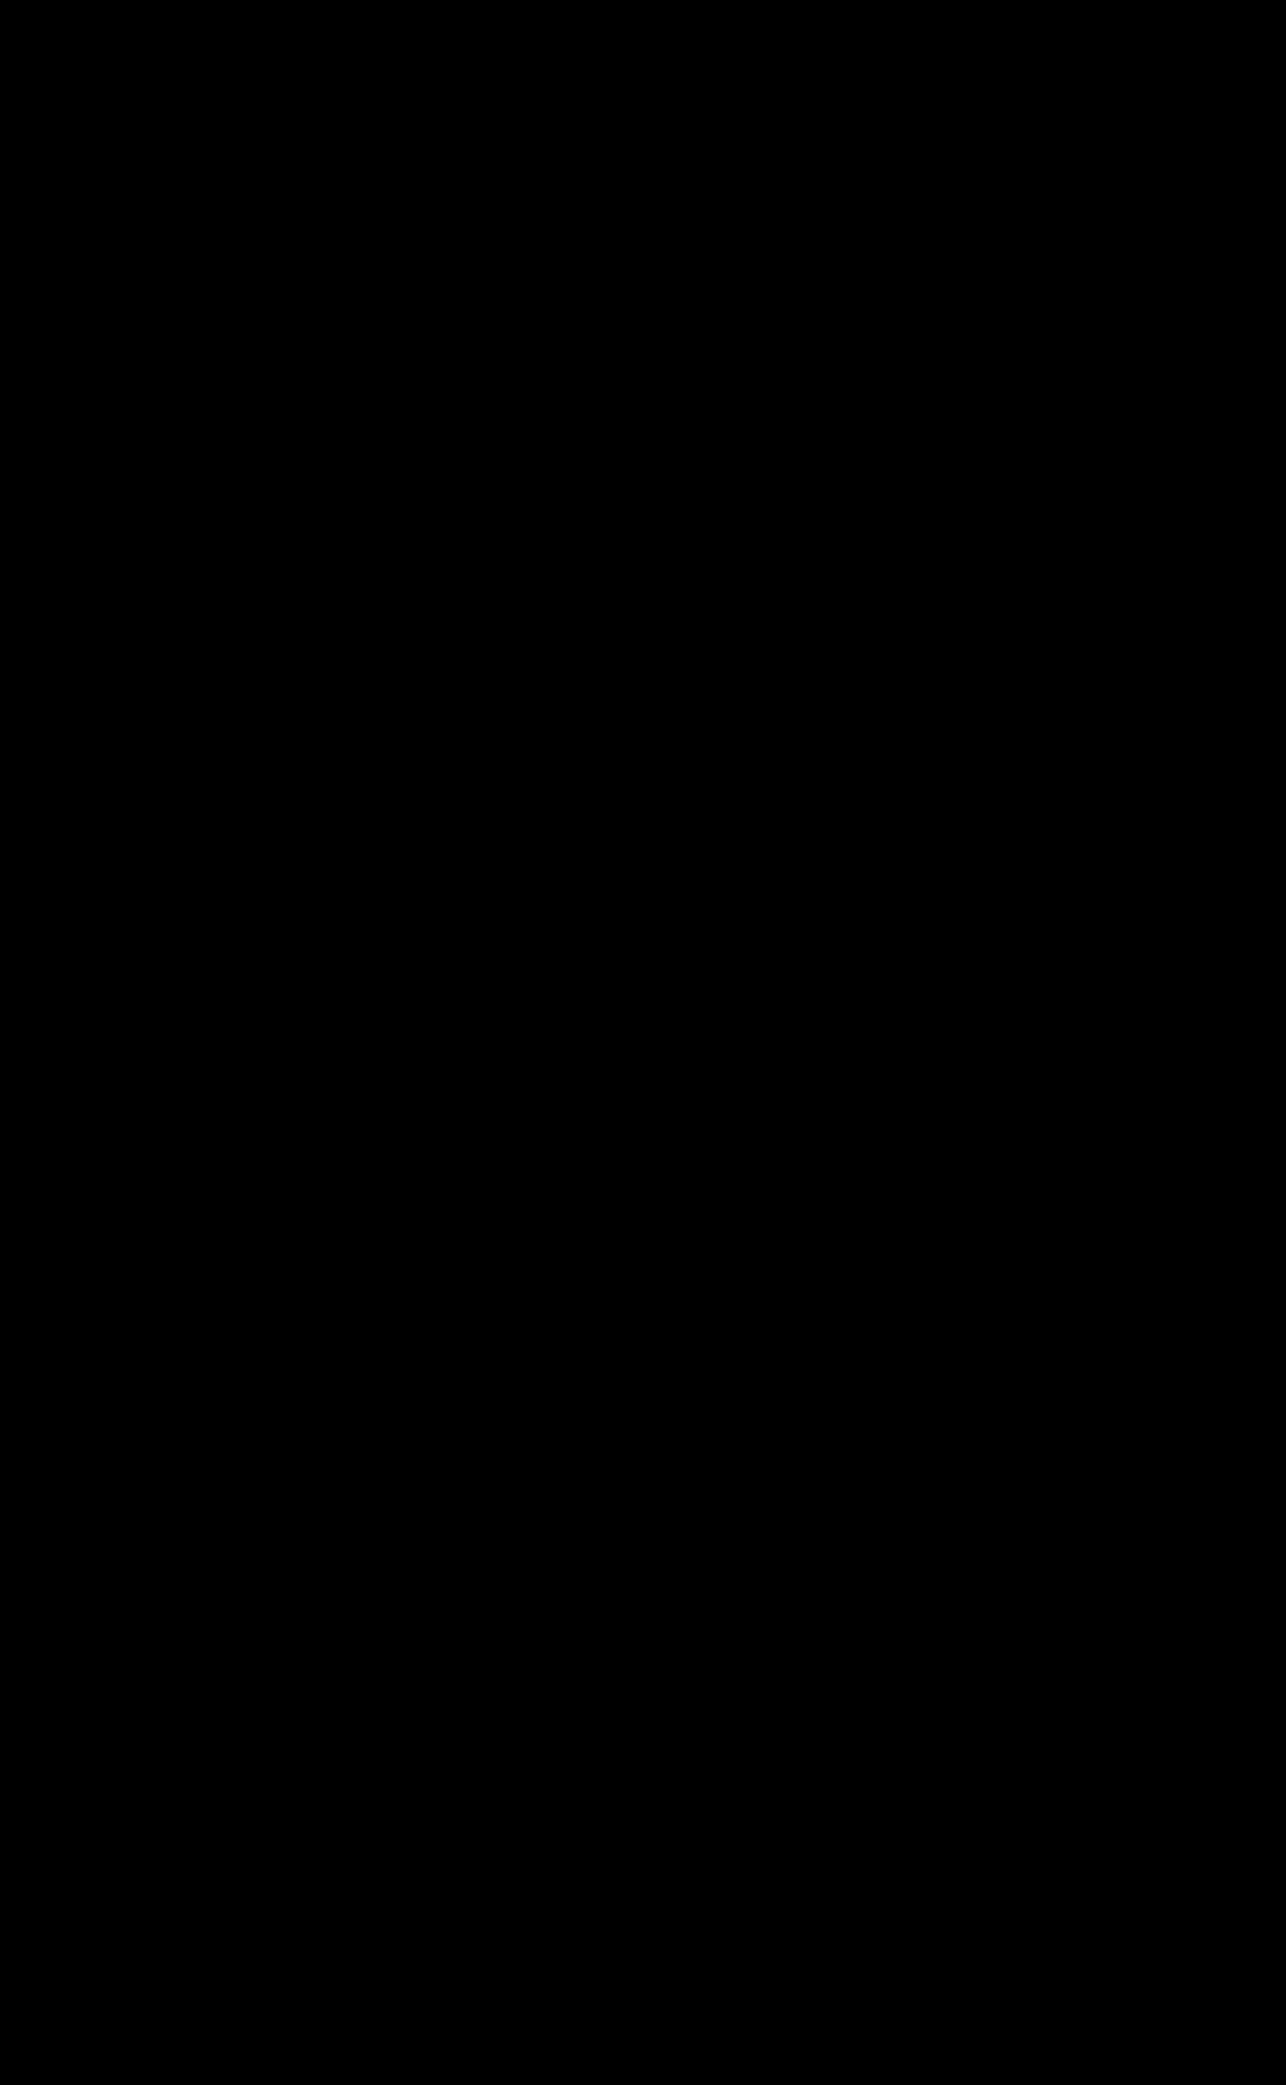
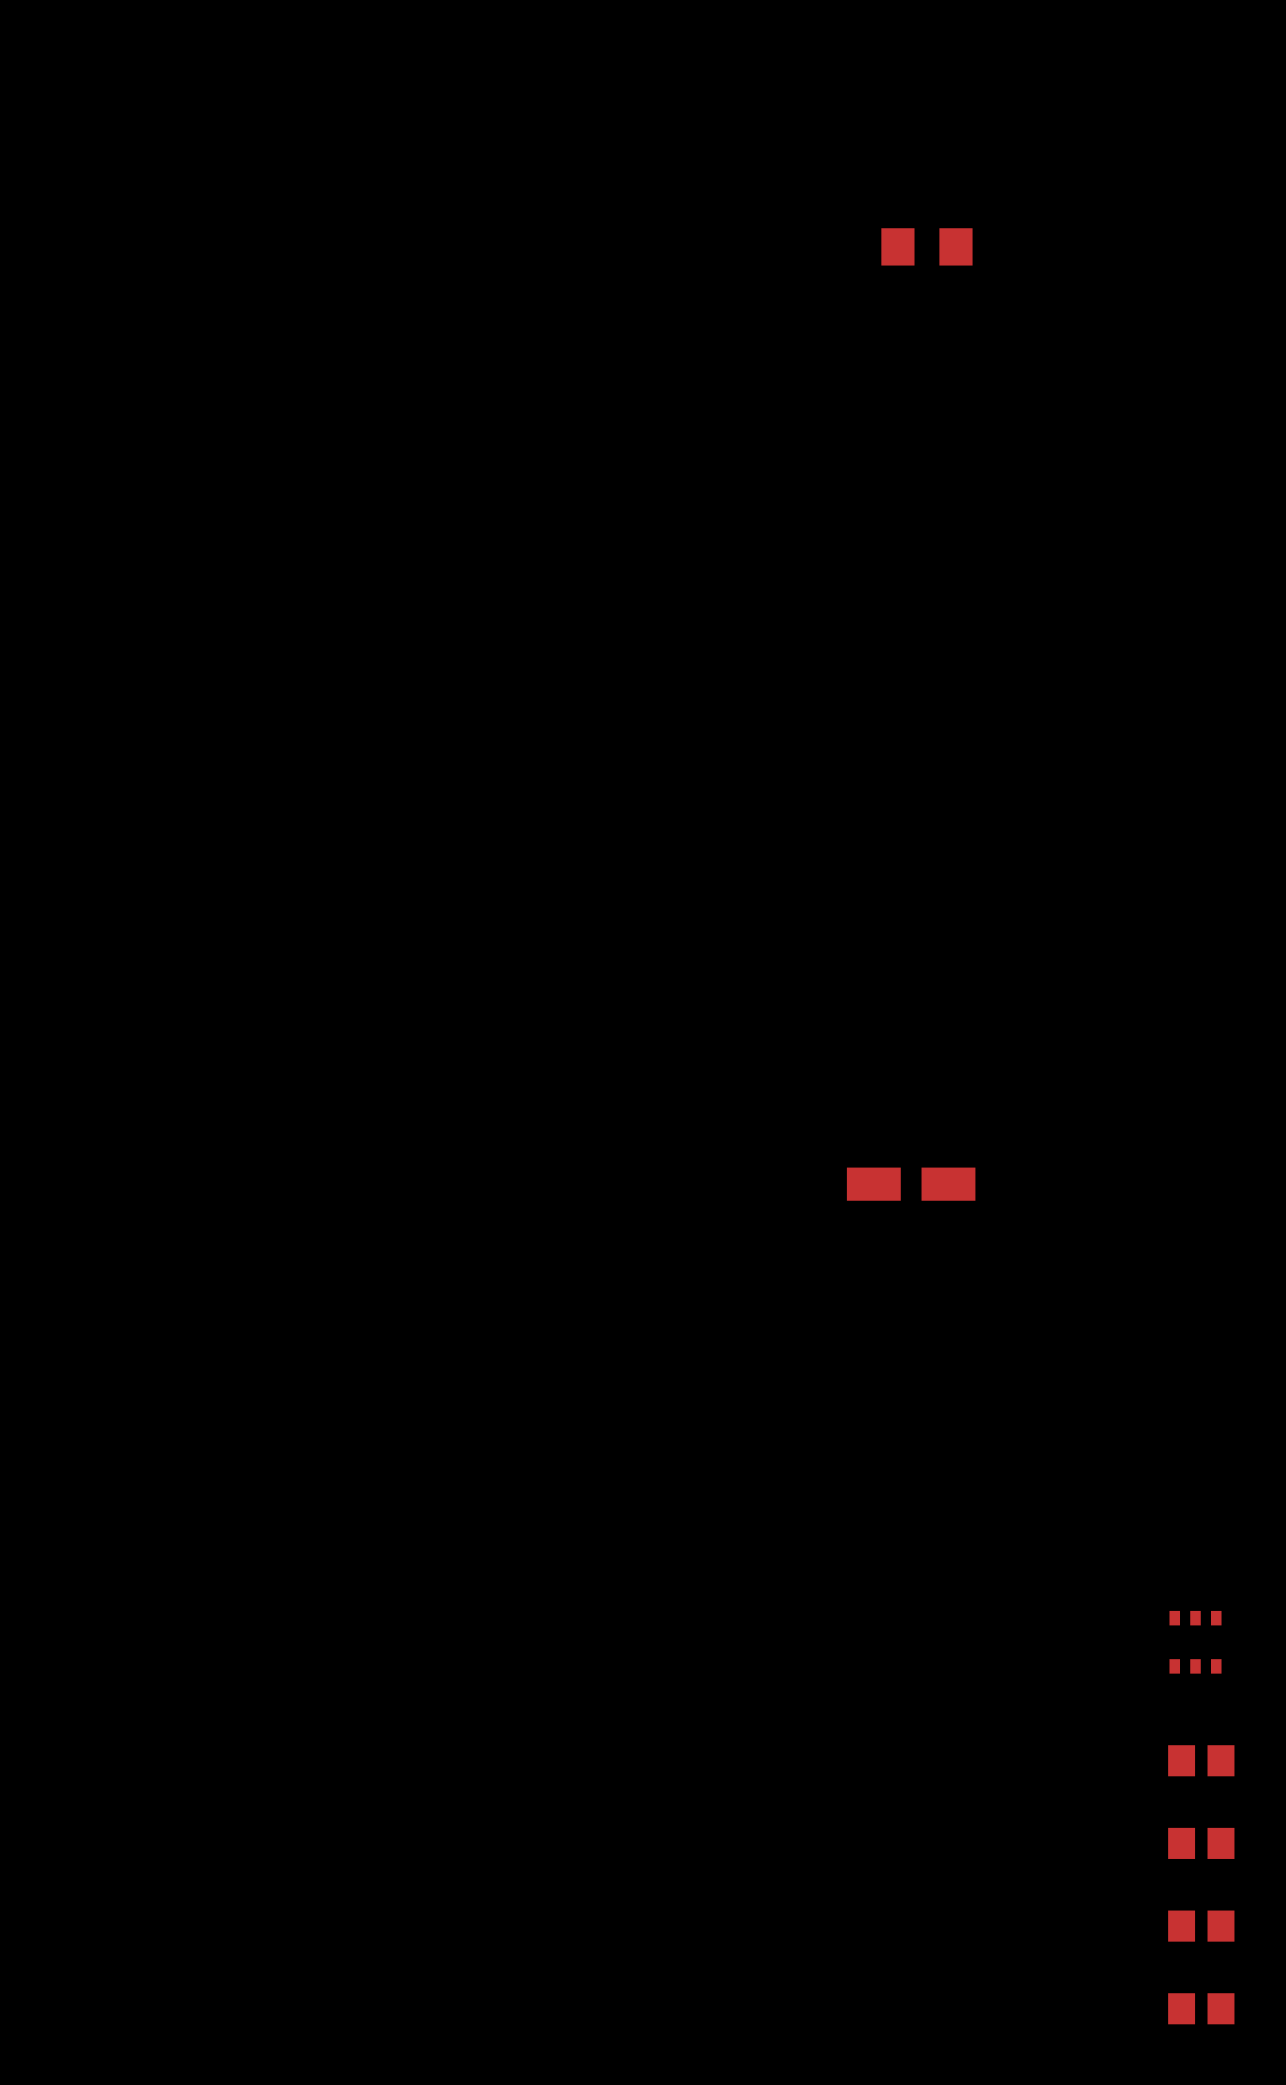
part: none -> (926, 246)
part: none -> (911, 1184)
part: none -> (1195, 1642)
part: none -> (1201, 1760)
part: none -> (1201, 1843)
part: none -> (1201, 1926)
part: none -> (1201, 2008)

